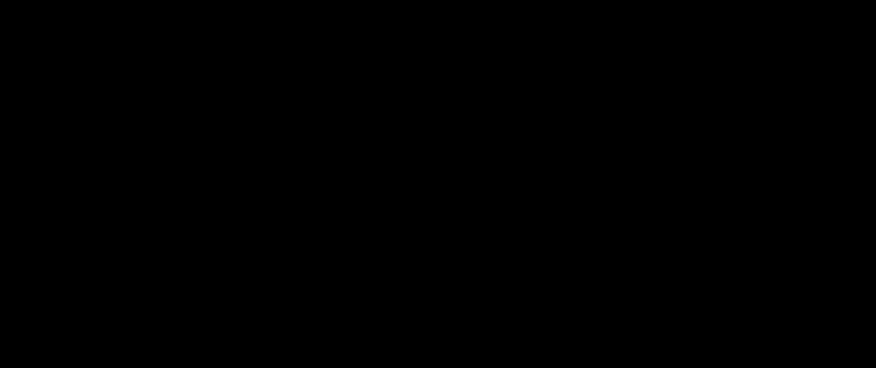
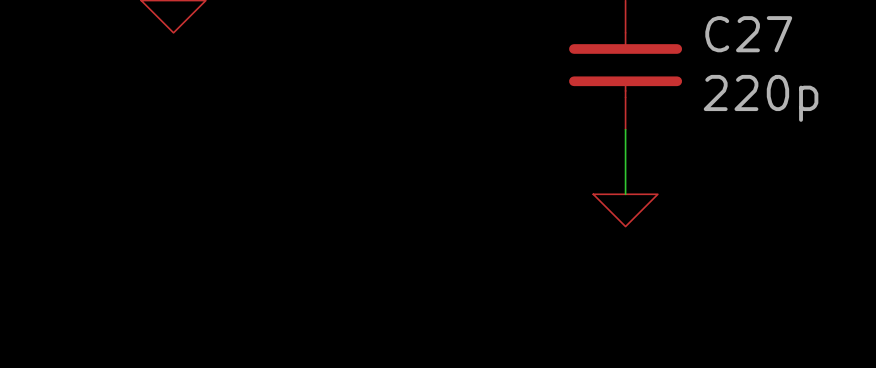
power symbol: none -> (173, 16)
C27: none -> 220p (625, 65)
wire: none -> (625, 129) (625, 194)
power symbol: none -> (625, 210)

